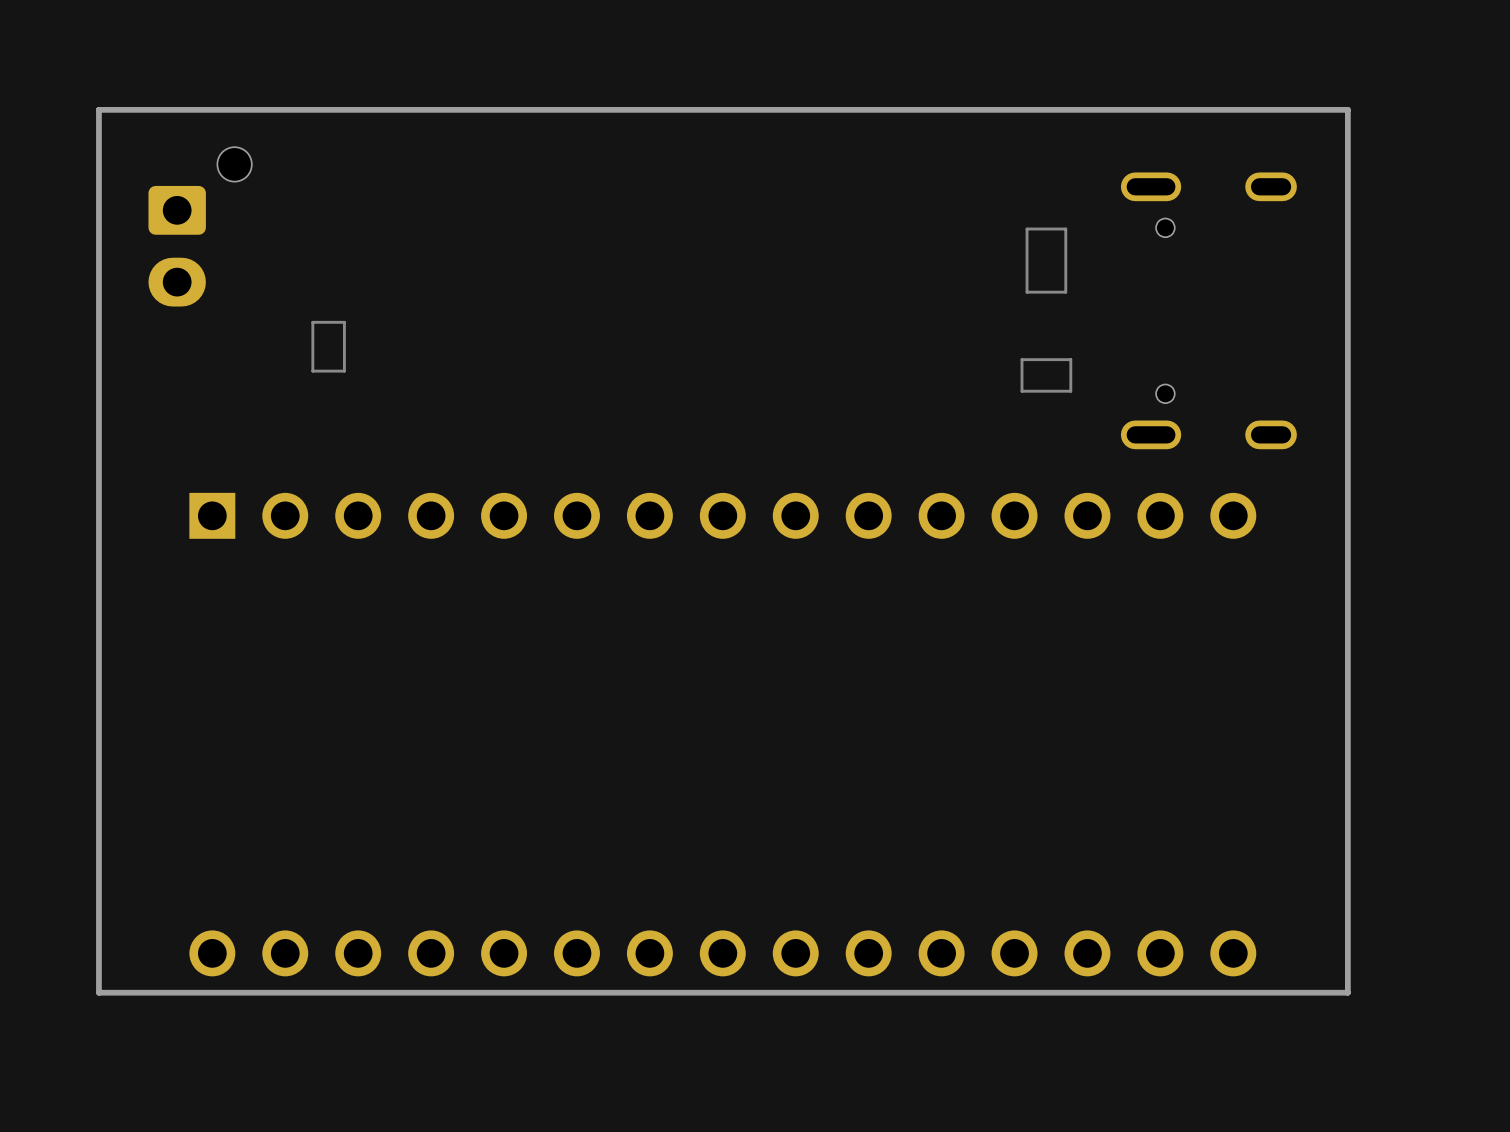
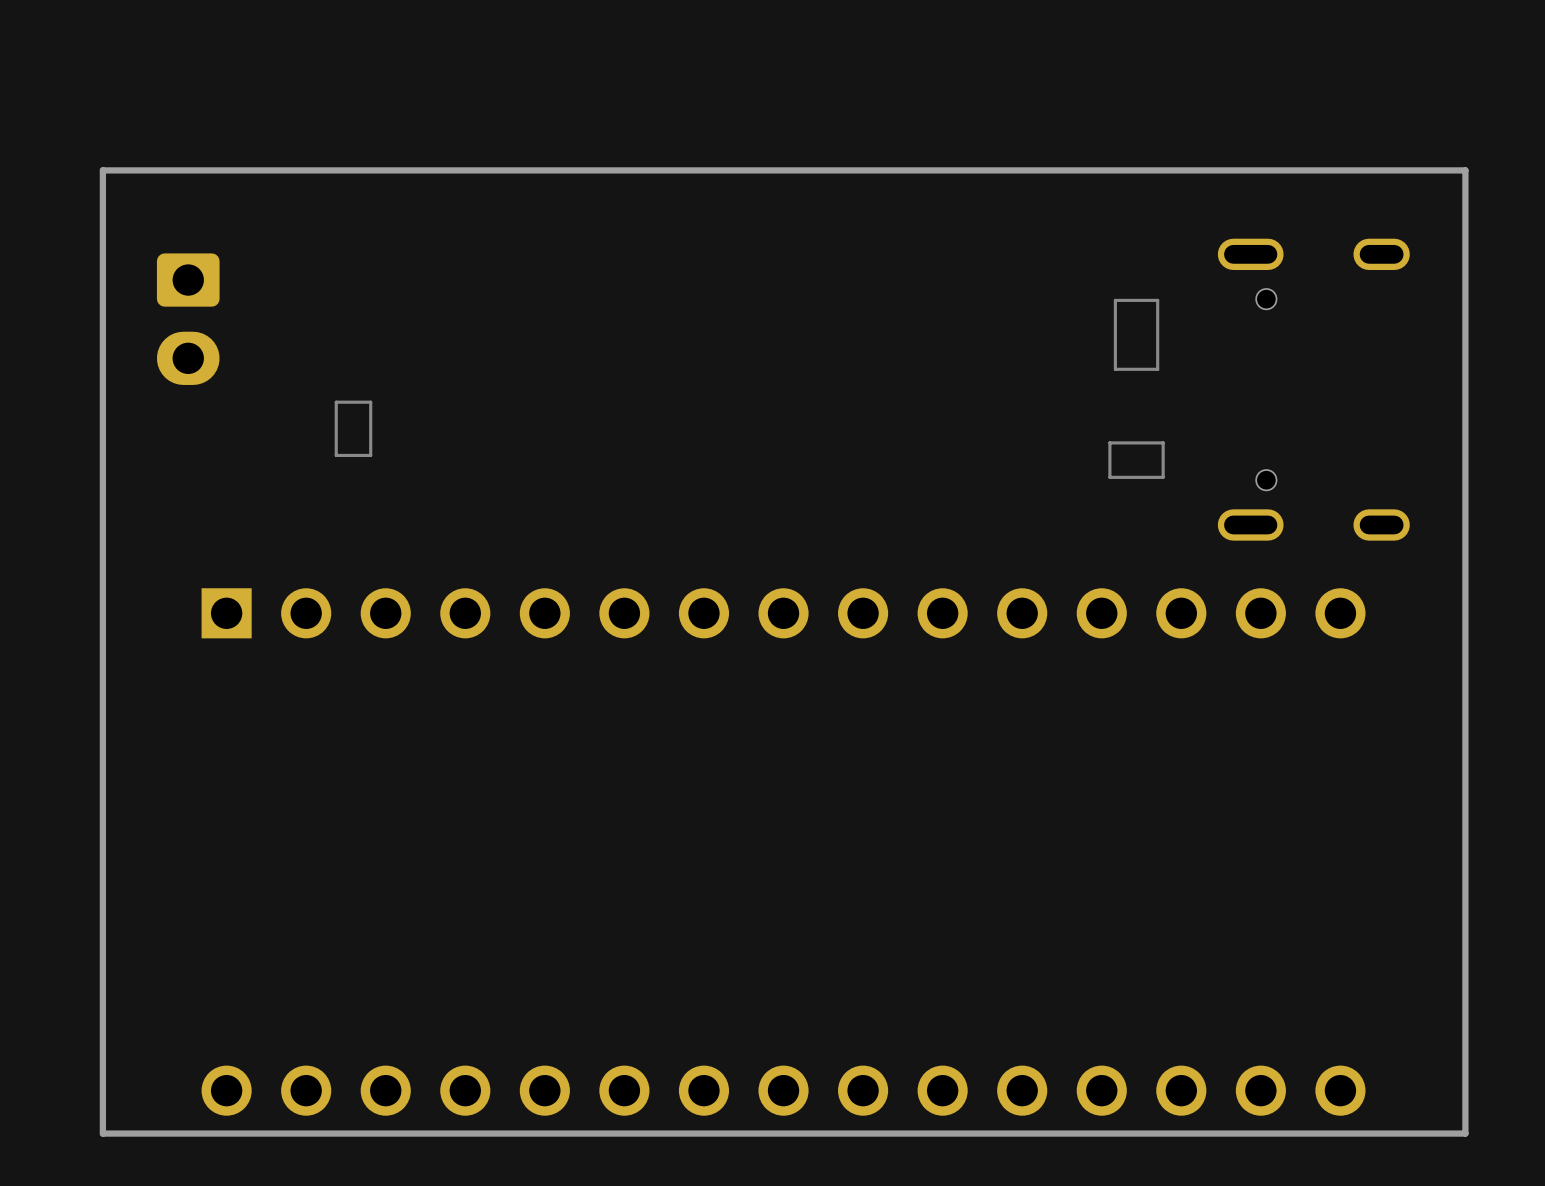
part: (200, 226) -> none

